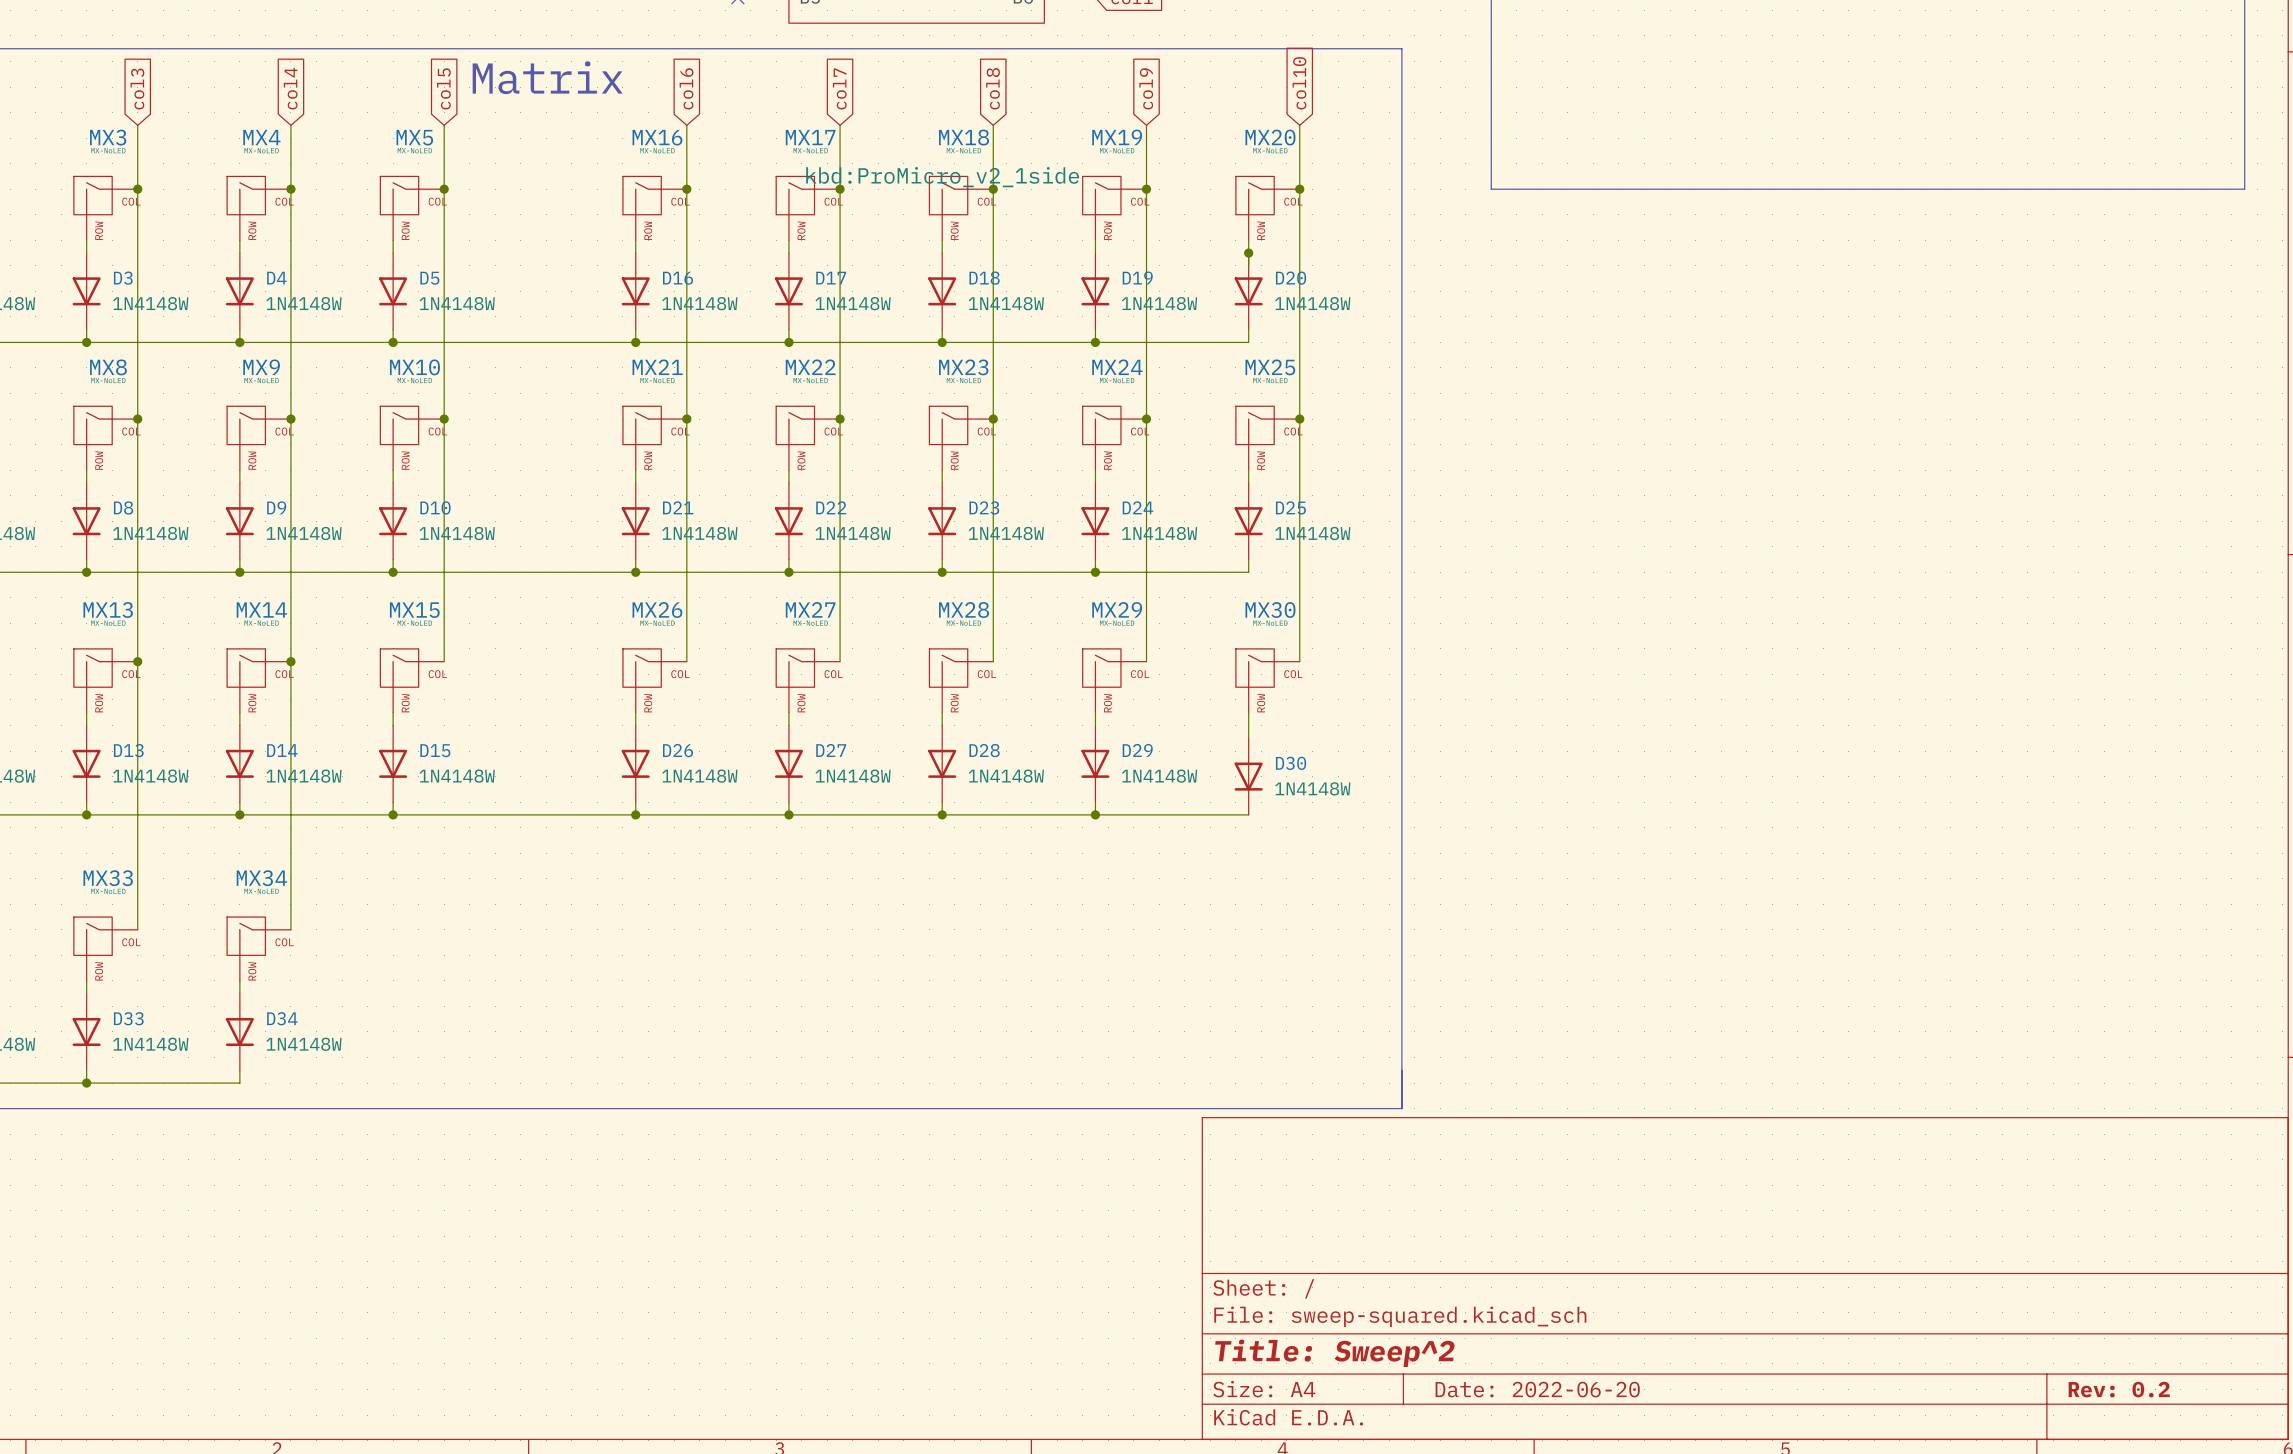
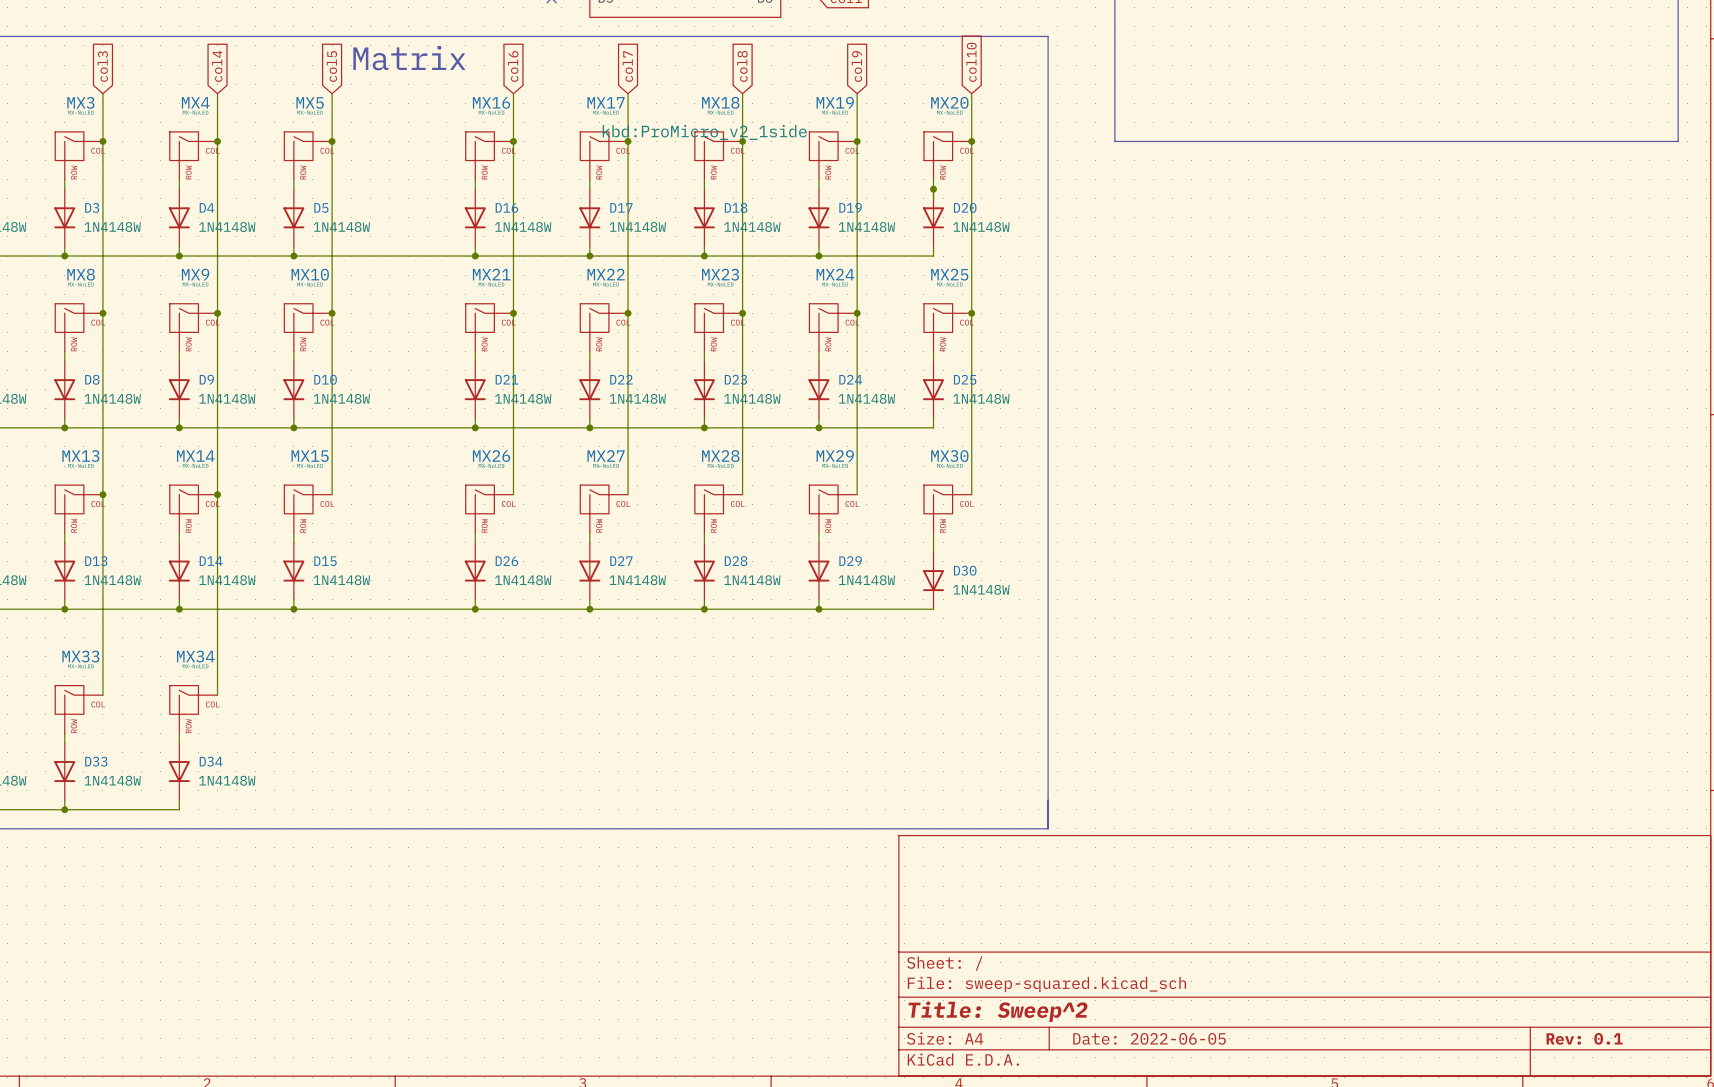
title block: Date: 2022-06-20 (1537, 1389) -> Date: 2022-06-05 (1149, 1038)
title block: Rev: 0.2 (2119, 1389) -> Rev: 0.1 (1584, 1038)

